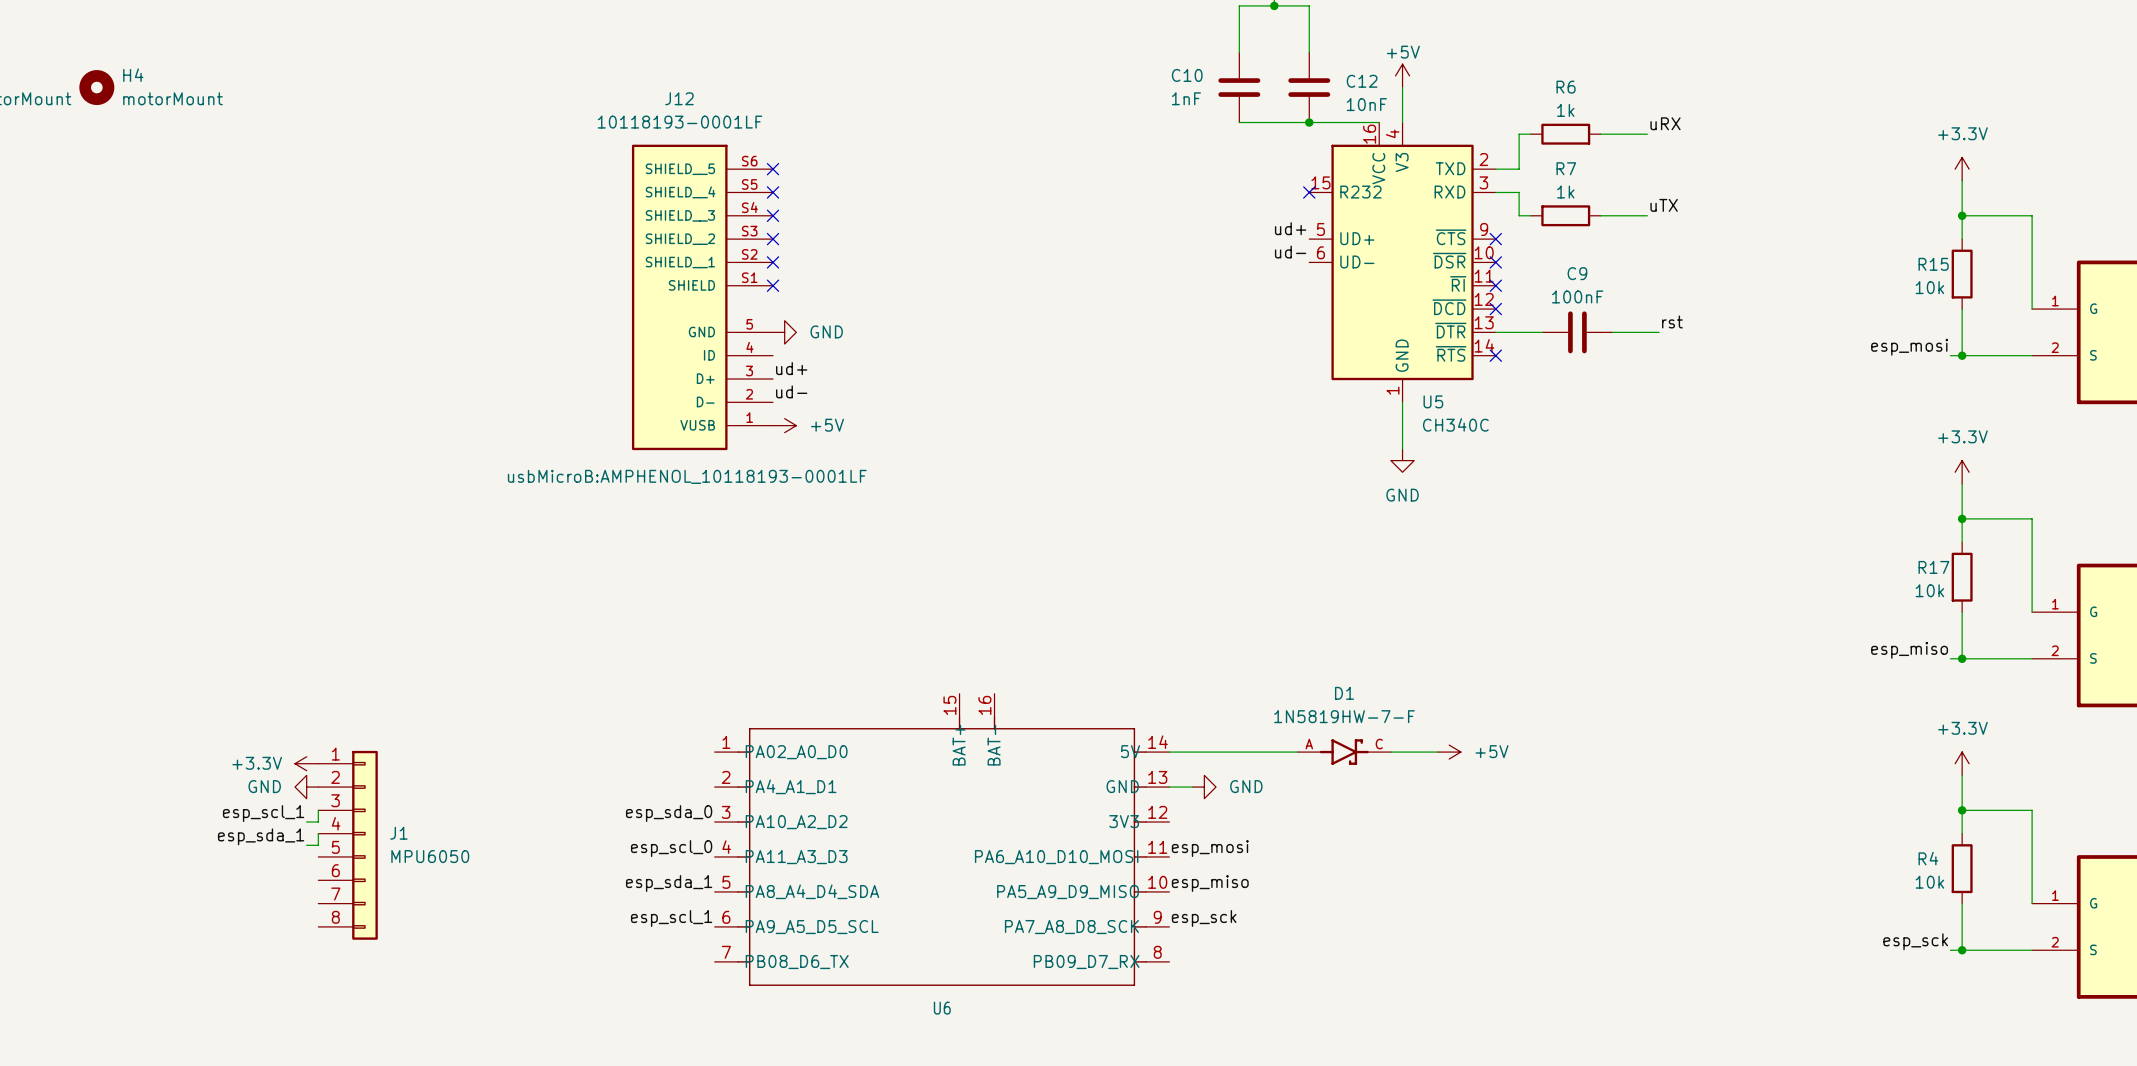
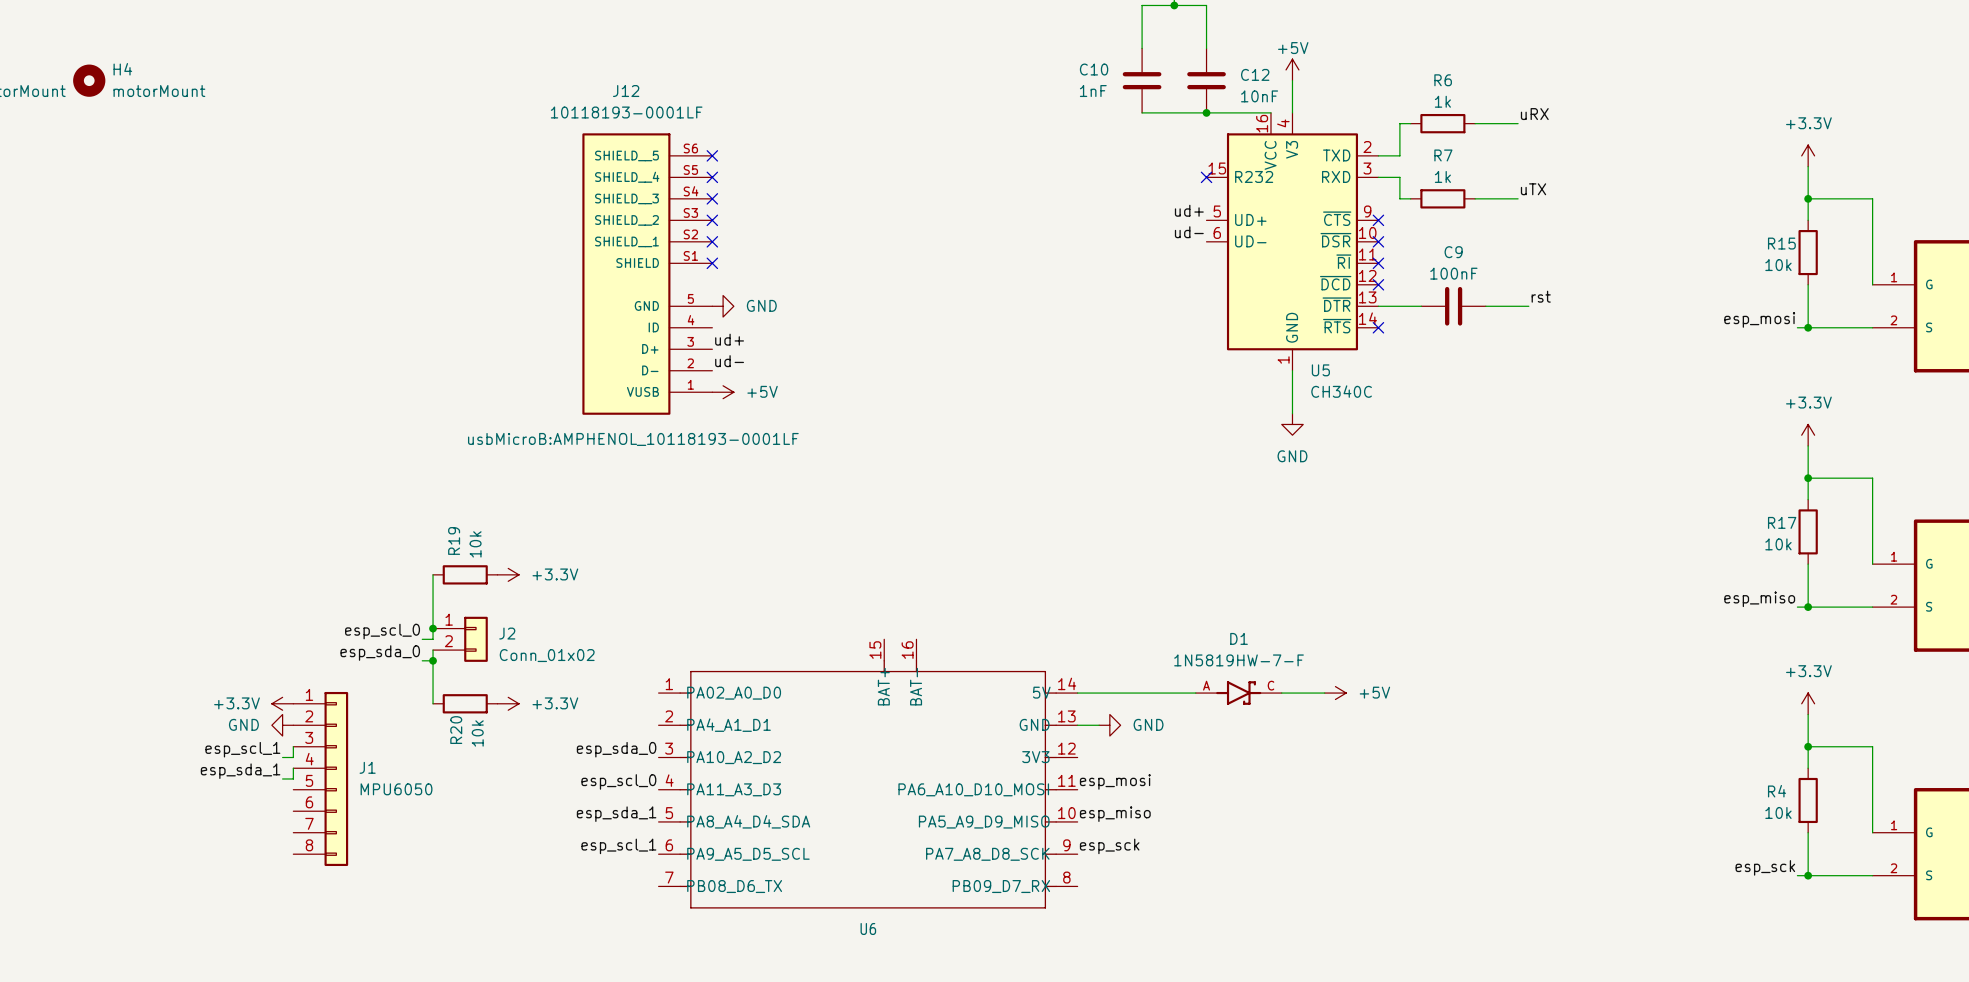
wire: none -> (433, 574) (433, 639) (422, 639)
R19: none -> 10k (465, 574)
power symbol: none -> +3.3V (508, 574)
junction: none -> (433, 628)
label: none -> esp_scl_0 (382, 631)
J2: none -> Conn_01x02 (460, 639)
wire: none -> (433, 650) (433, 703)
label: none -> esp_sda_0 (380, 653)
wire: none -> (422, 660) (433, 660)
junction: none -> (433, 660)
R20: none -> 10k (465, 703)
power symbol: none -> +3.3V (508, 703)

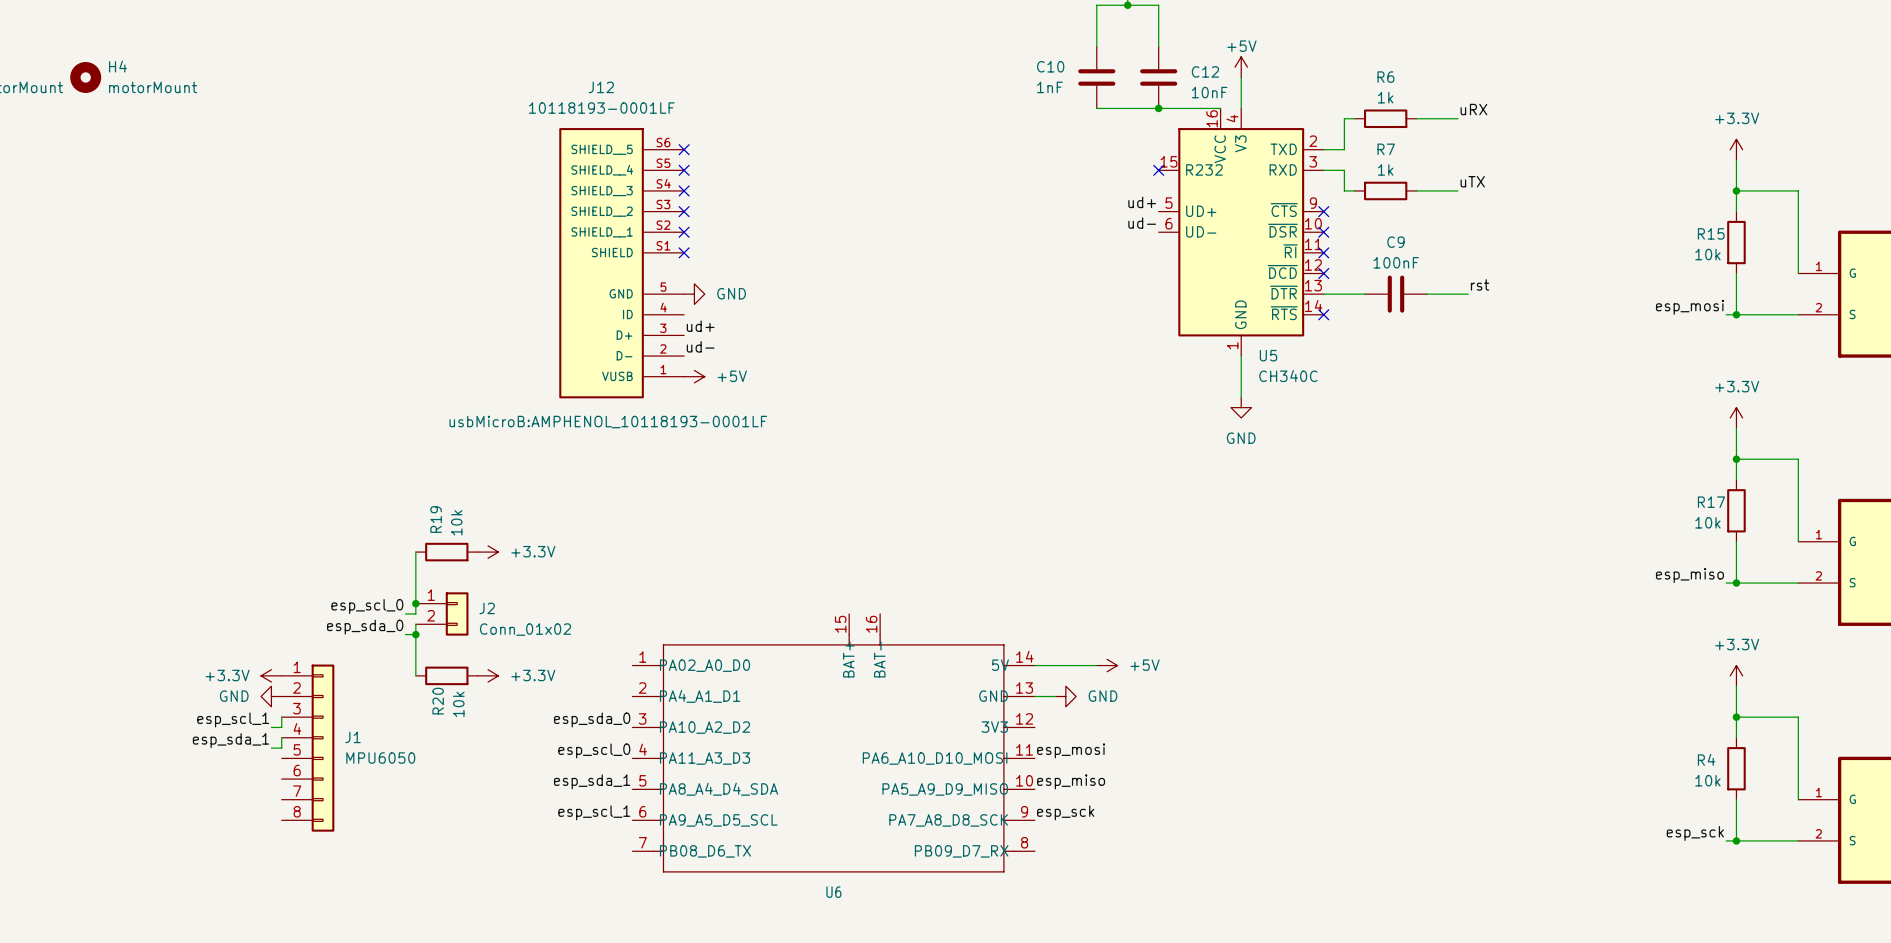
wire: (1142, 693) (1195, 693) -> none
D1: 1N5819HW-7-F (1238, 693) -> none
wire: (1281, 693) (1324, 693) -> none
power symbol position: +5V (1335, 693) -> +5V (1107, 665)

